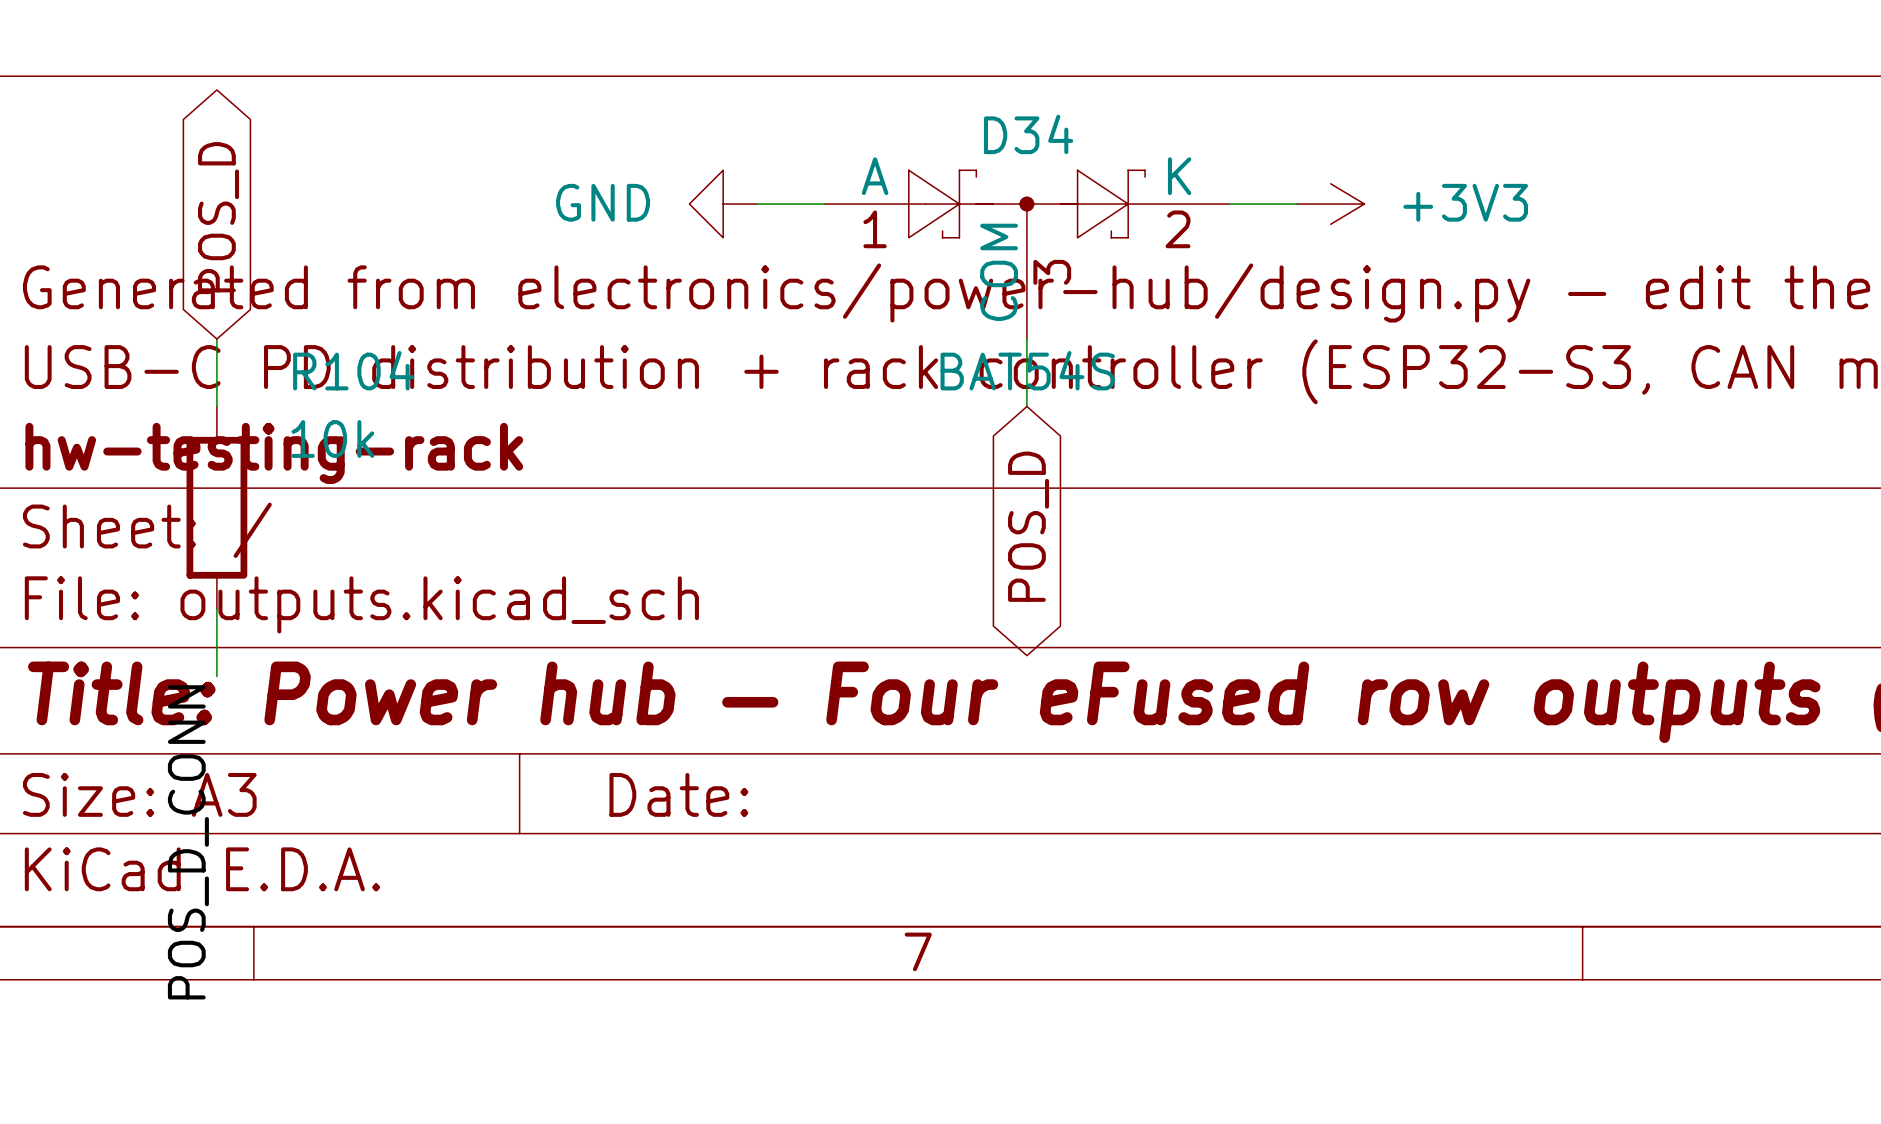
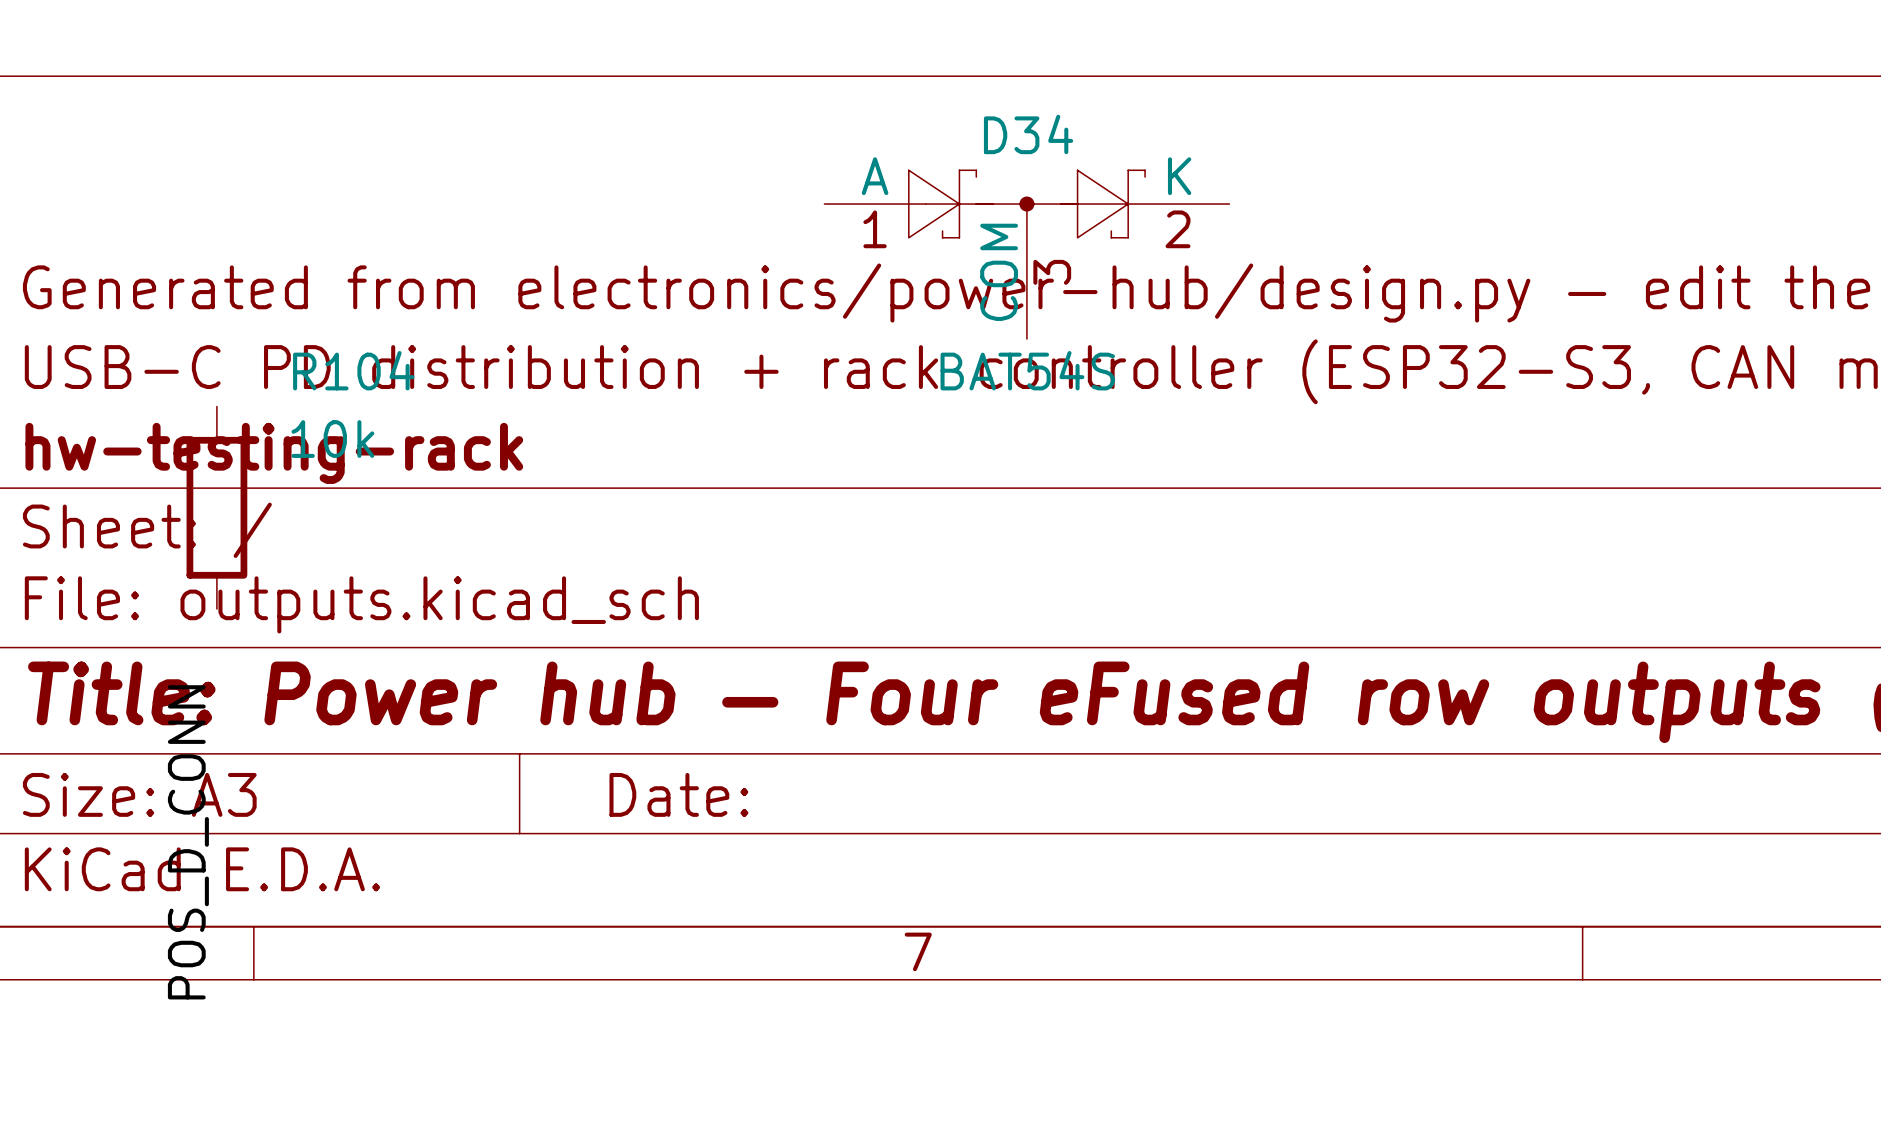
power symbol: GND (723, 204) -> none
wire: (756, 204) (824, 204) -> none
wire: (1229, 204) (1296, 204) -> none
power symbol: +3V3 (1330, 204) -> none
global label: POS_D (218, 217) -> none
wire: (216, 339) (216, 406) -> none
wire: (1026, 339) (1026, 406) -> none
global label: POS_D (1028, 526) -> none
wire: (216, 609) (216, 676) -> none

